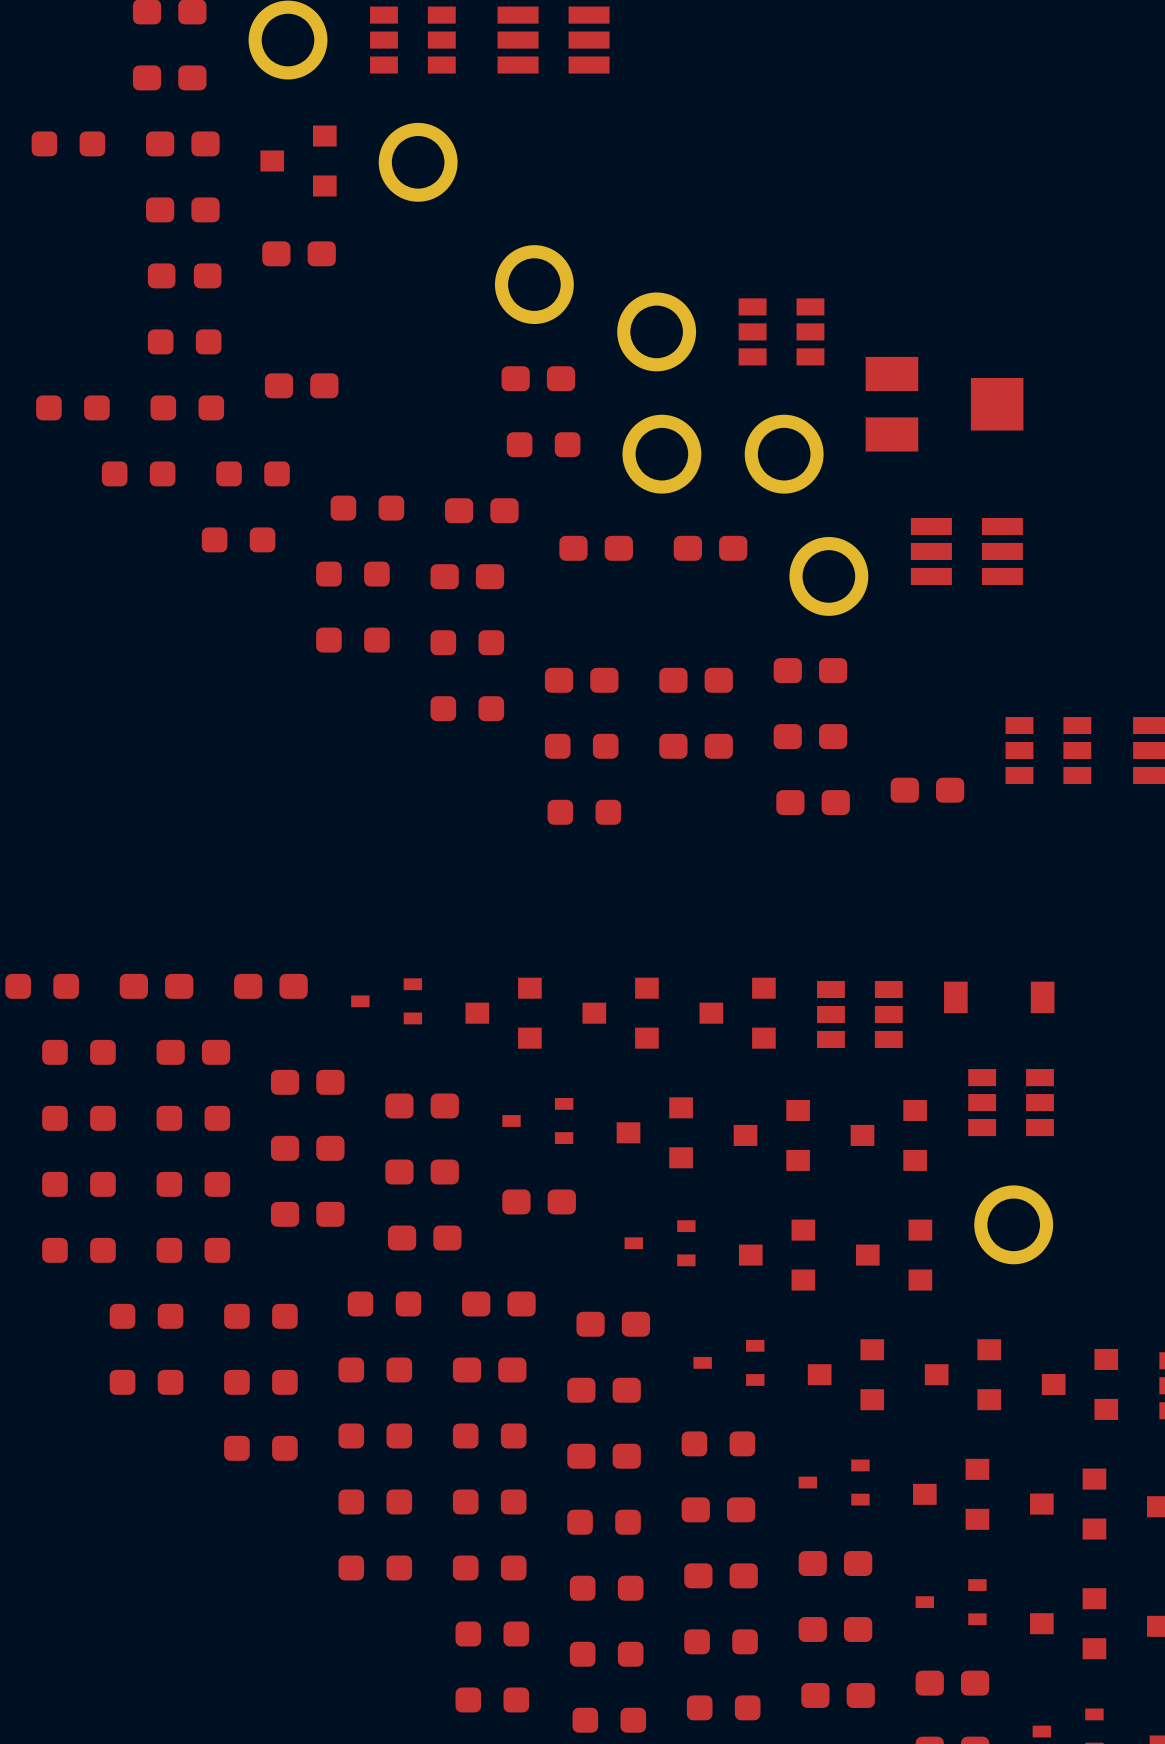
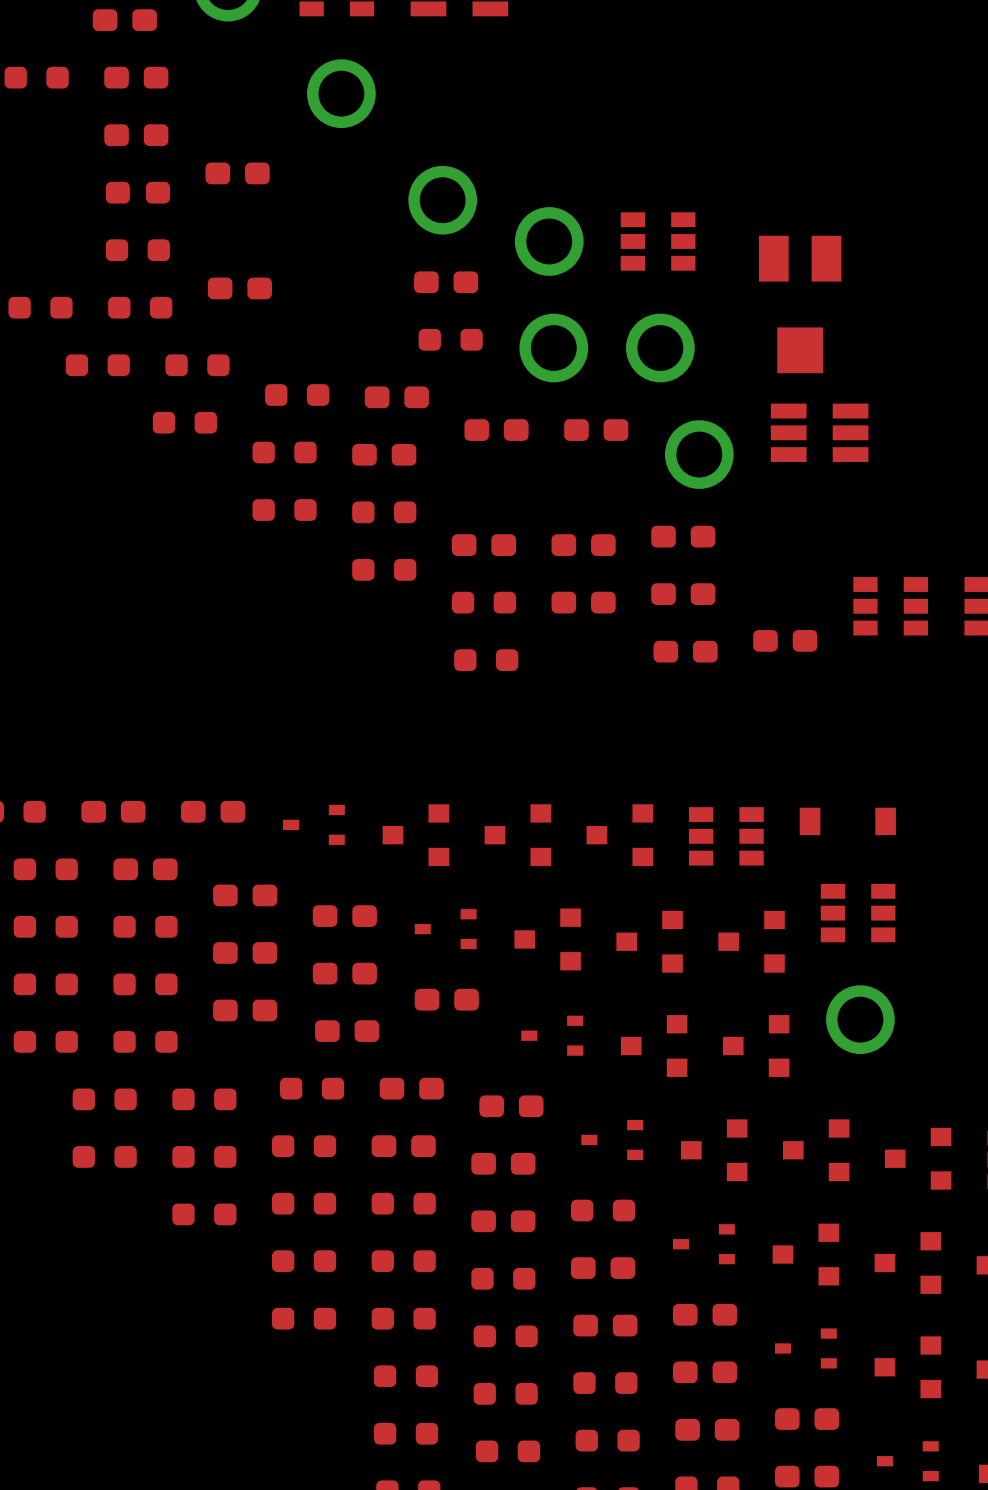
part: (298, 161) -> none
part rotation: 0° (944, 404) -> 90° clockwise (800, 304)

